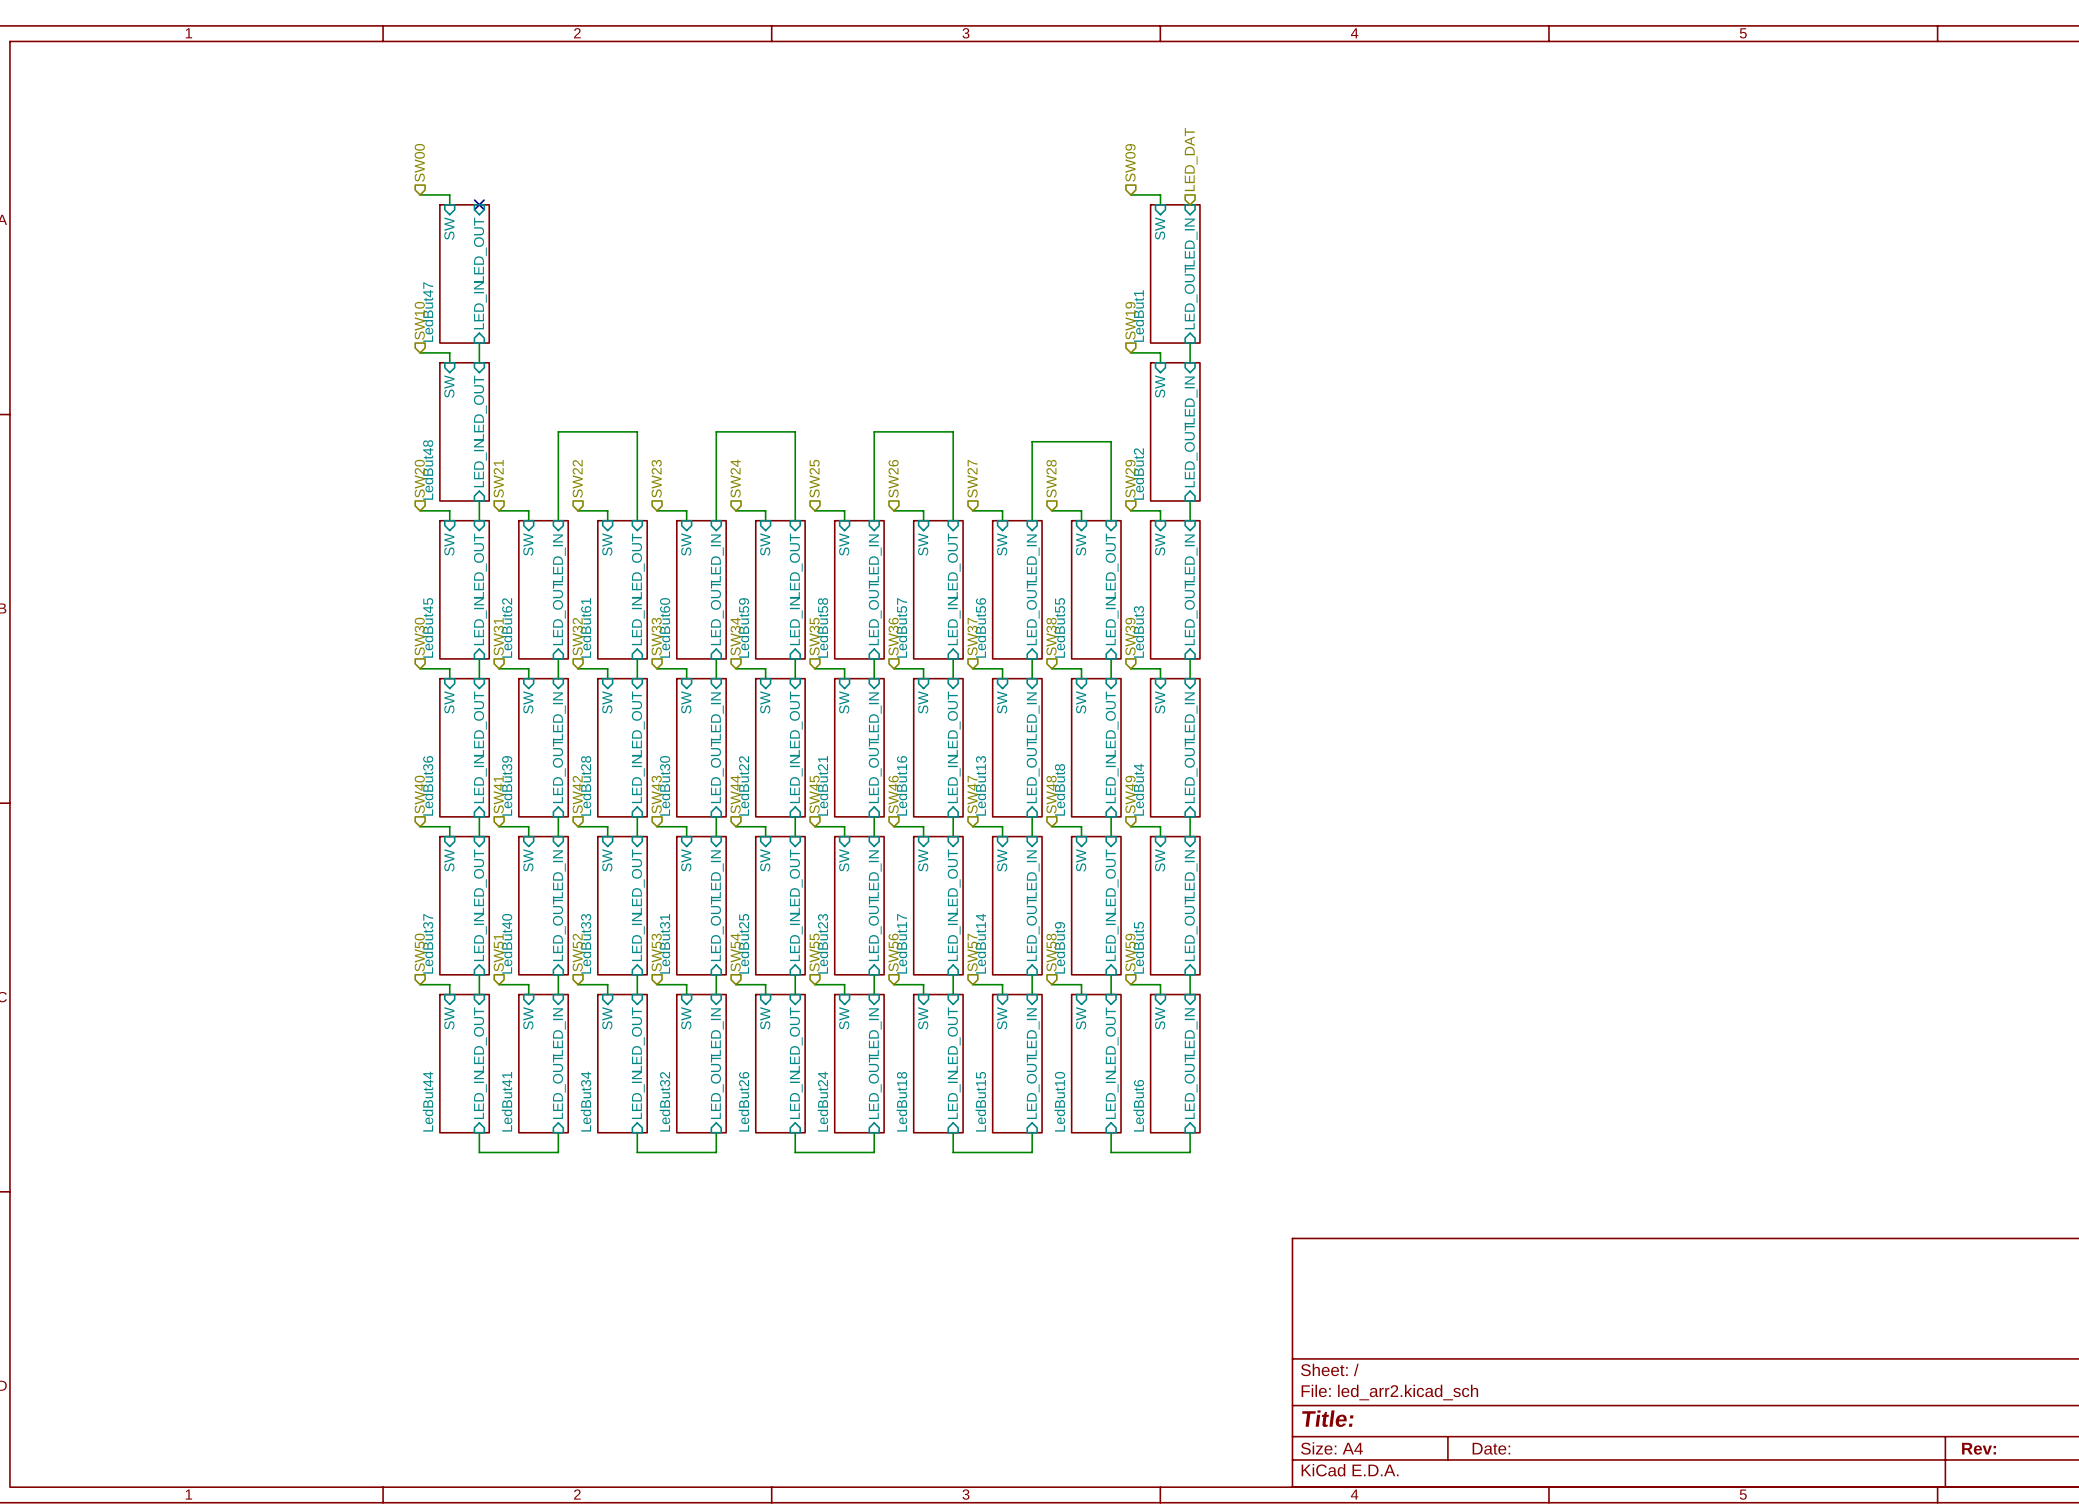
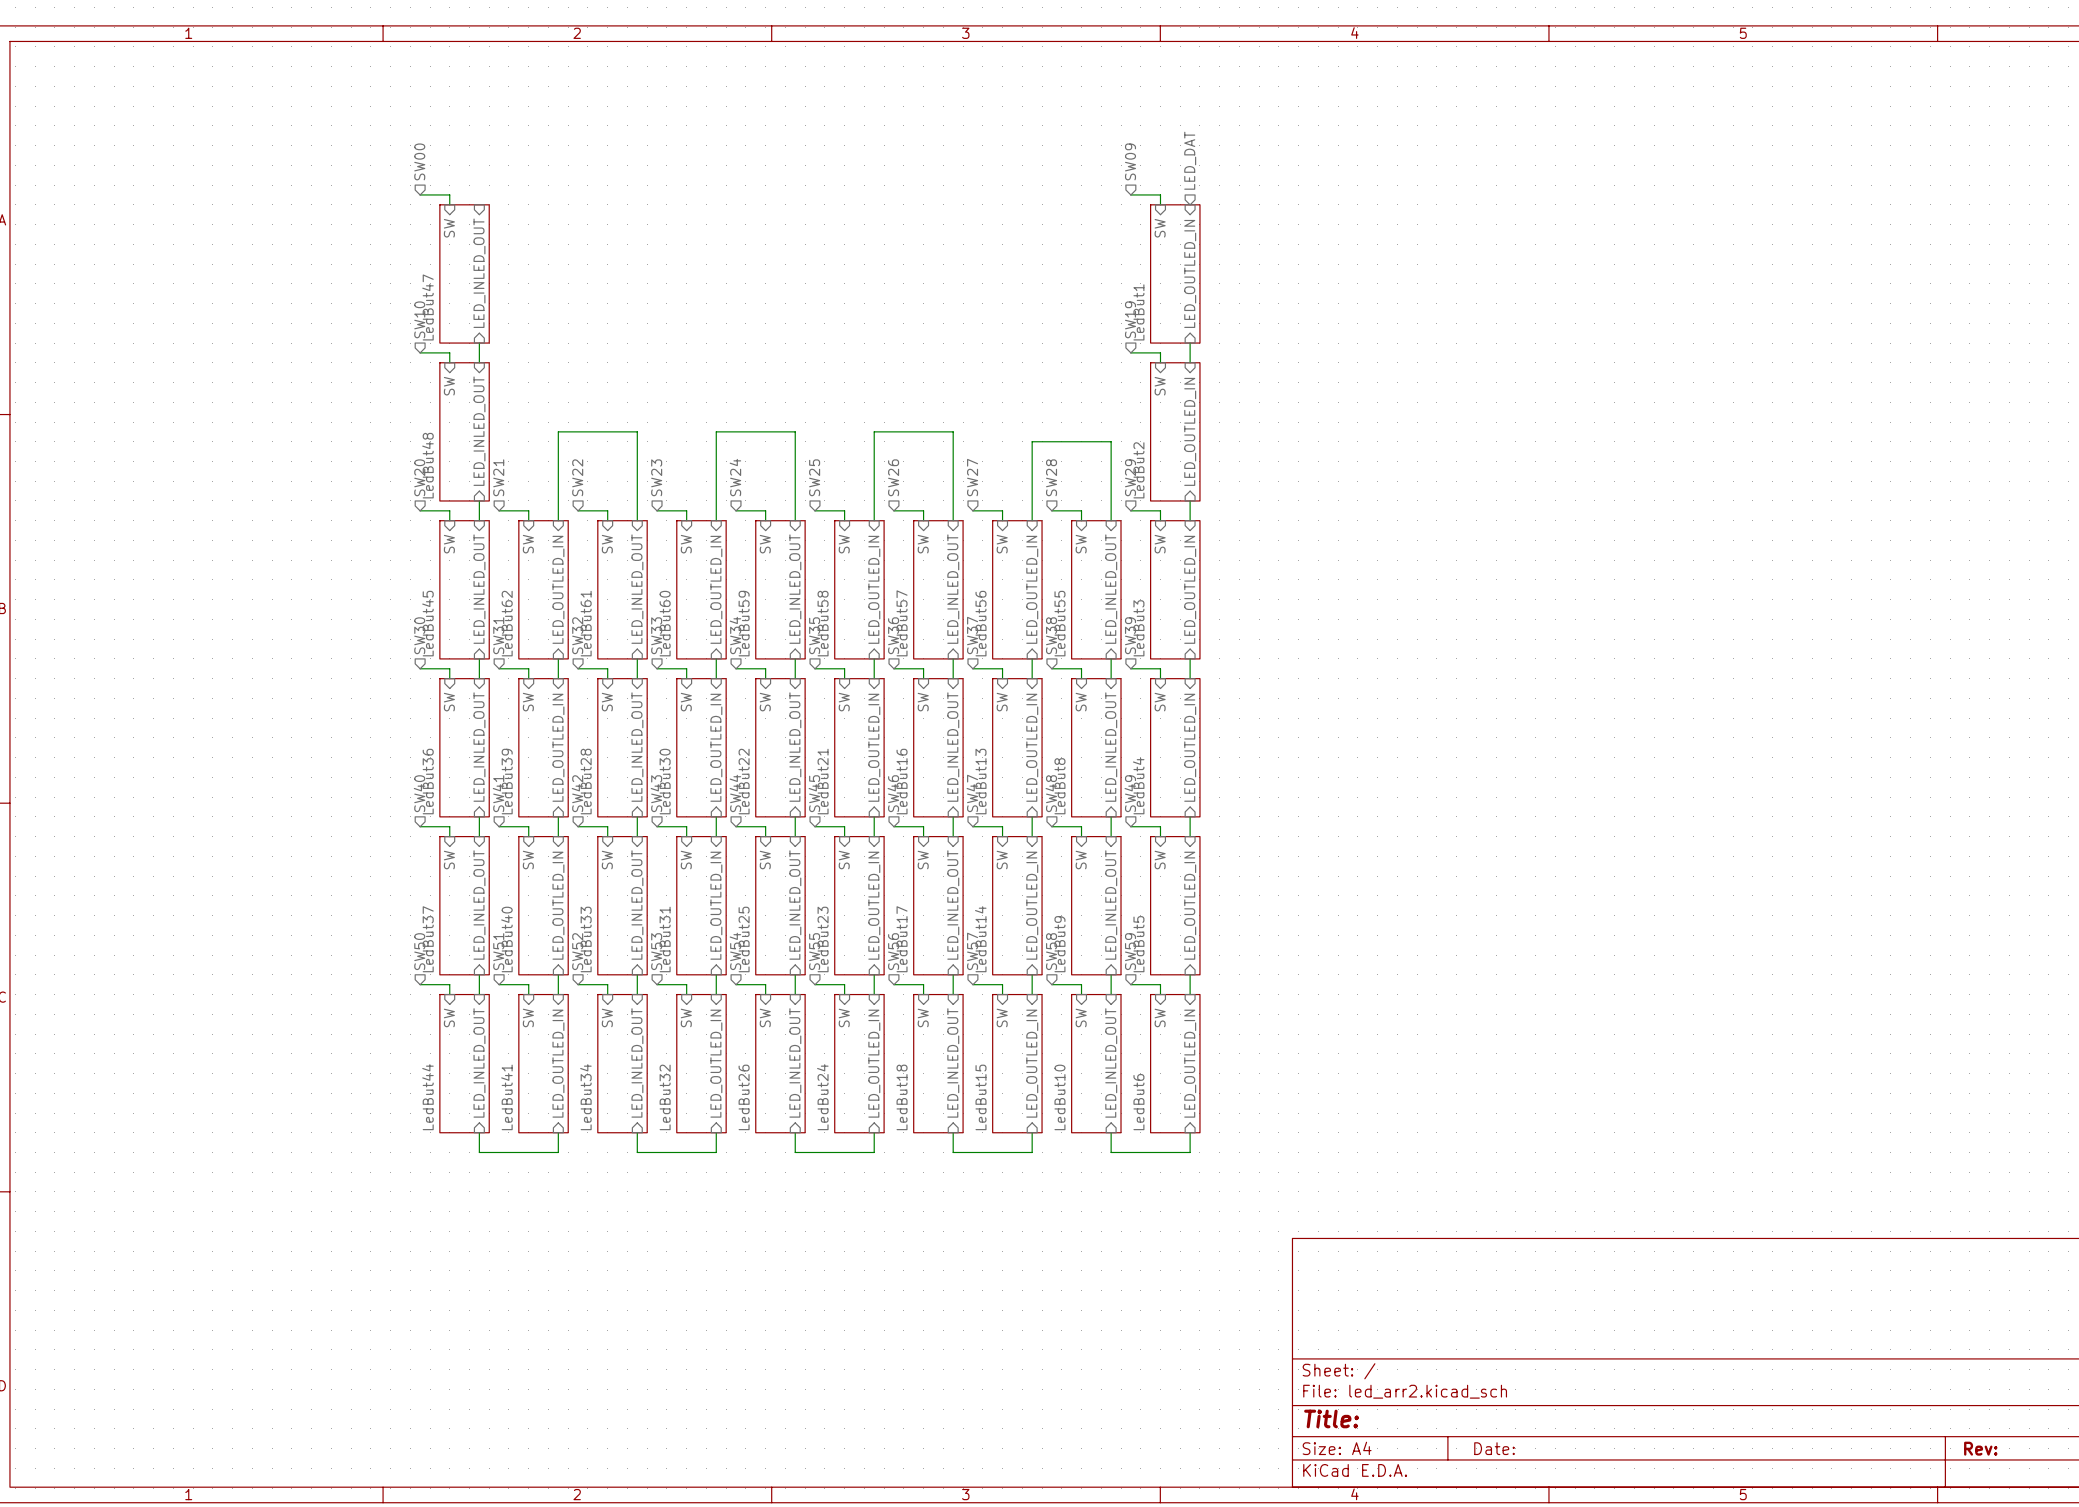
no-connect mark: (479, 204) -> none

